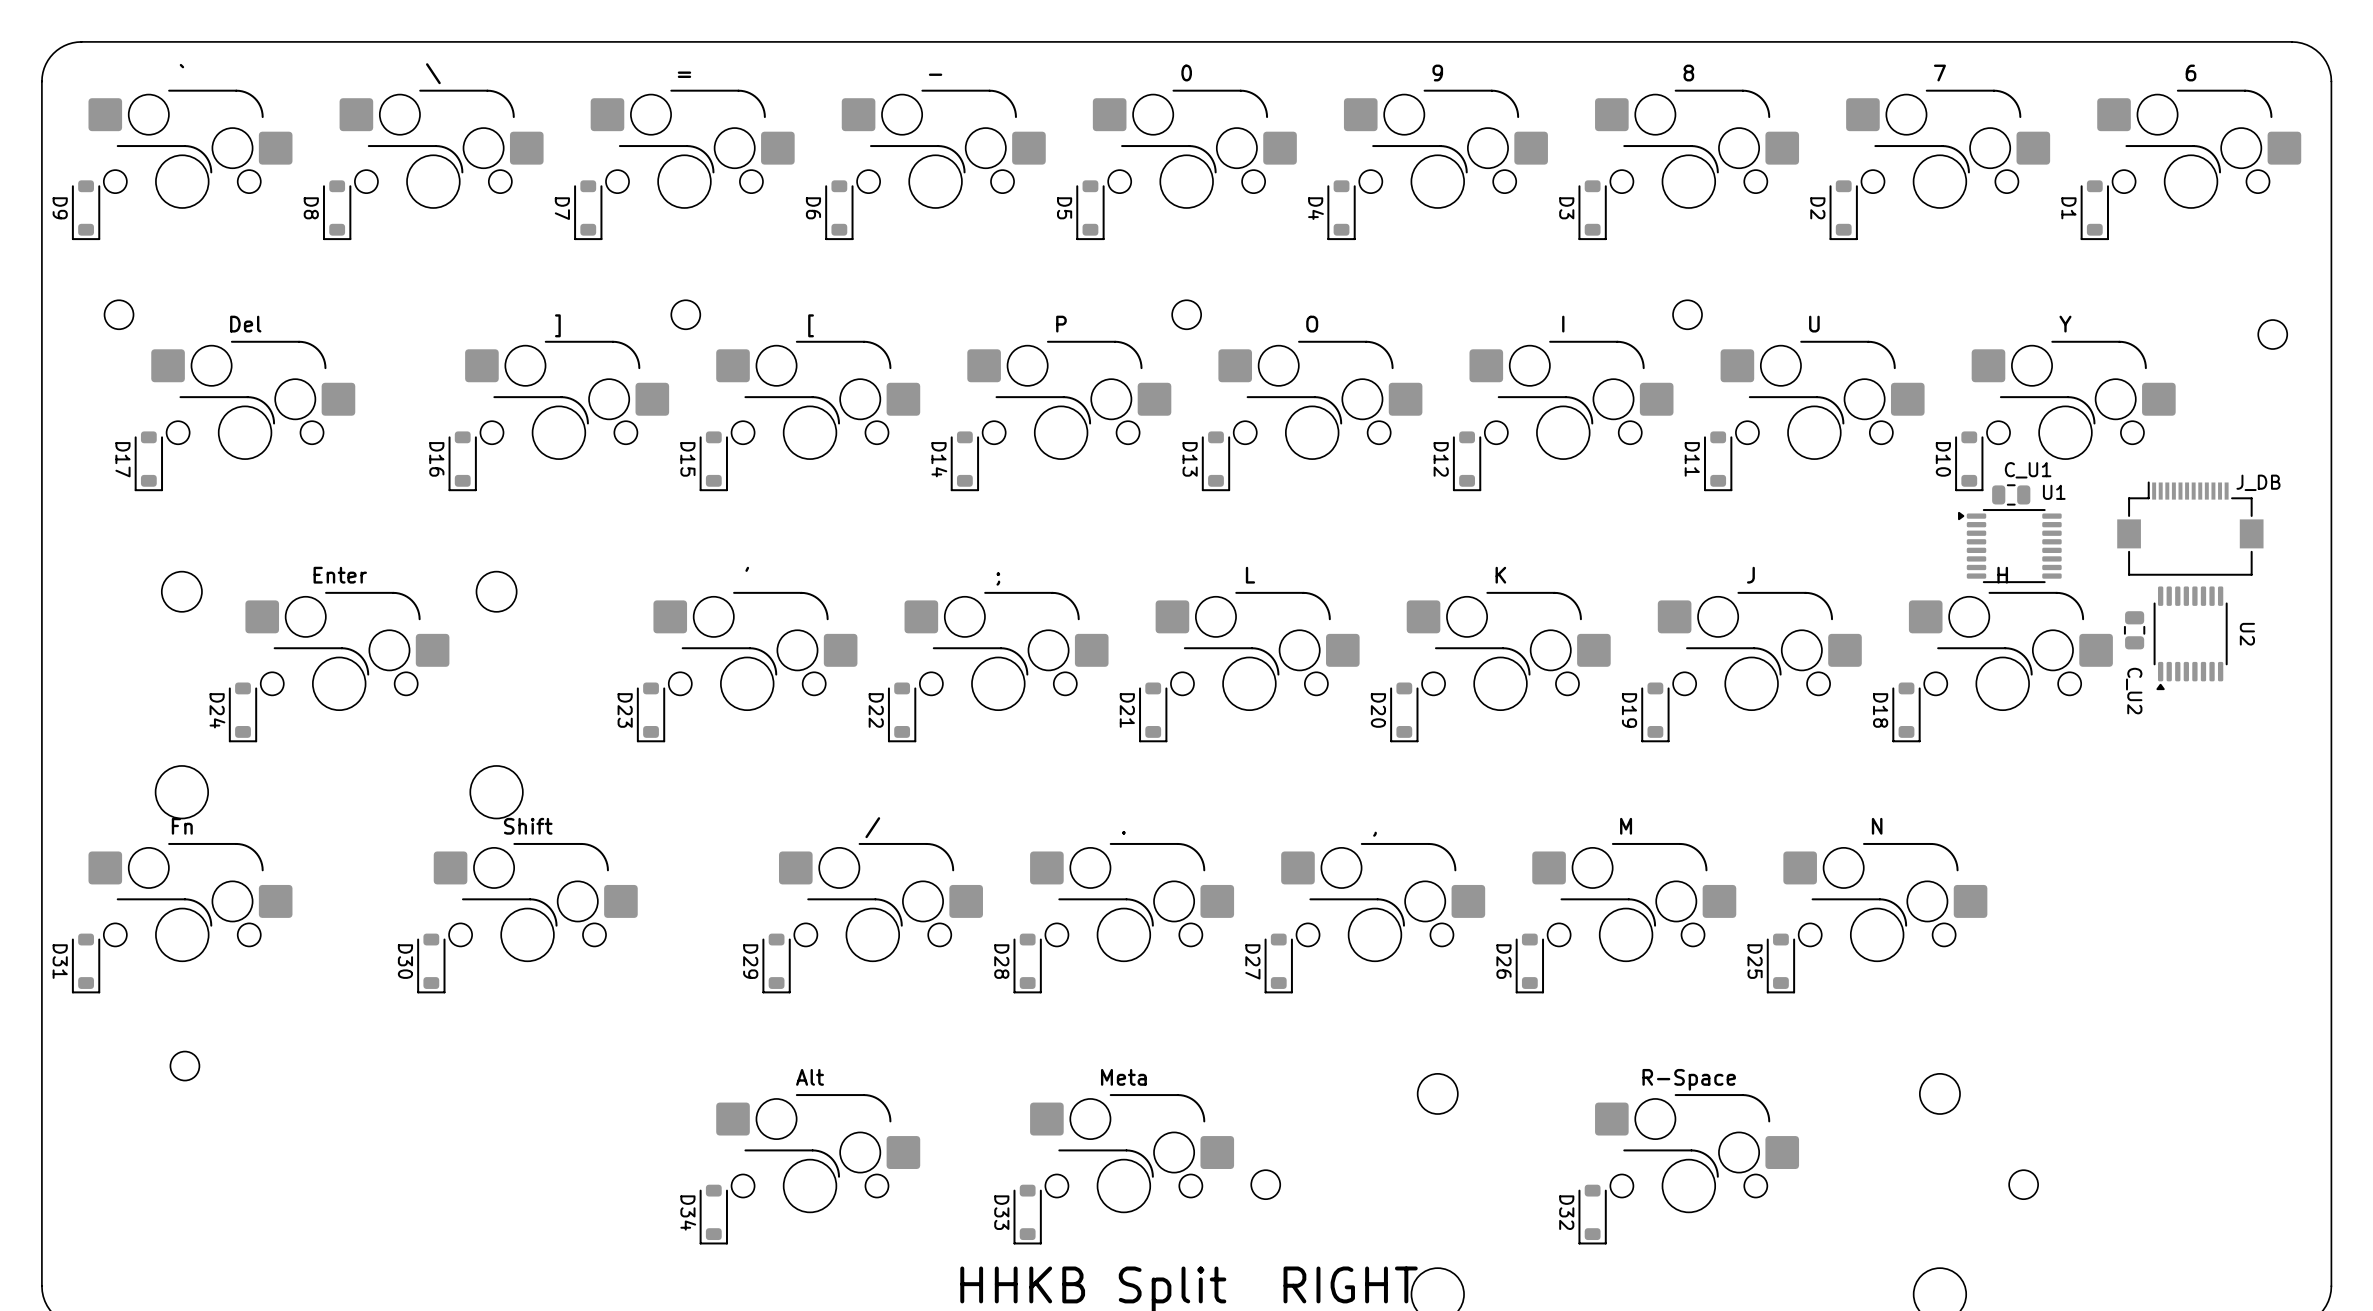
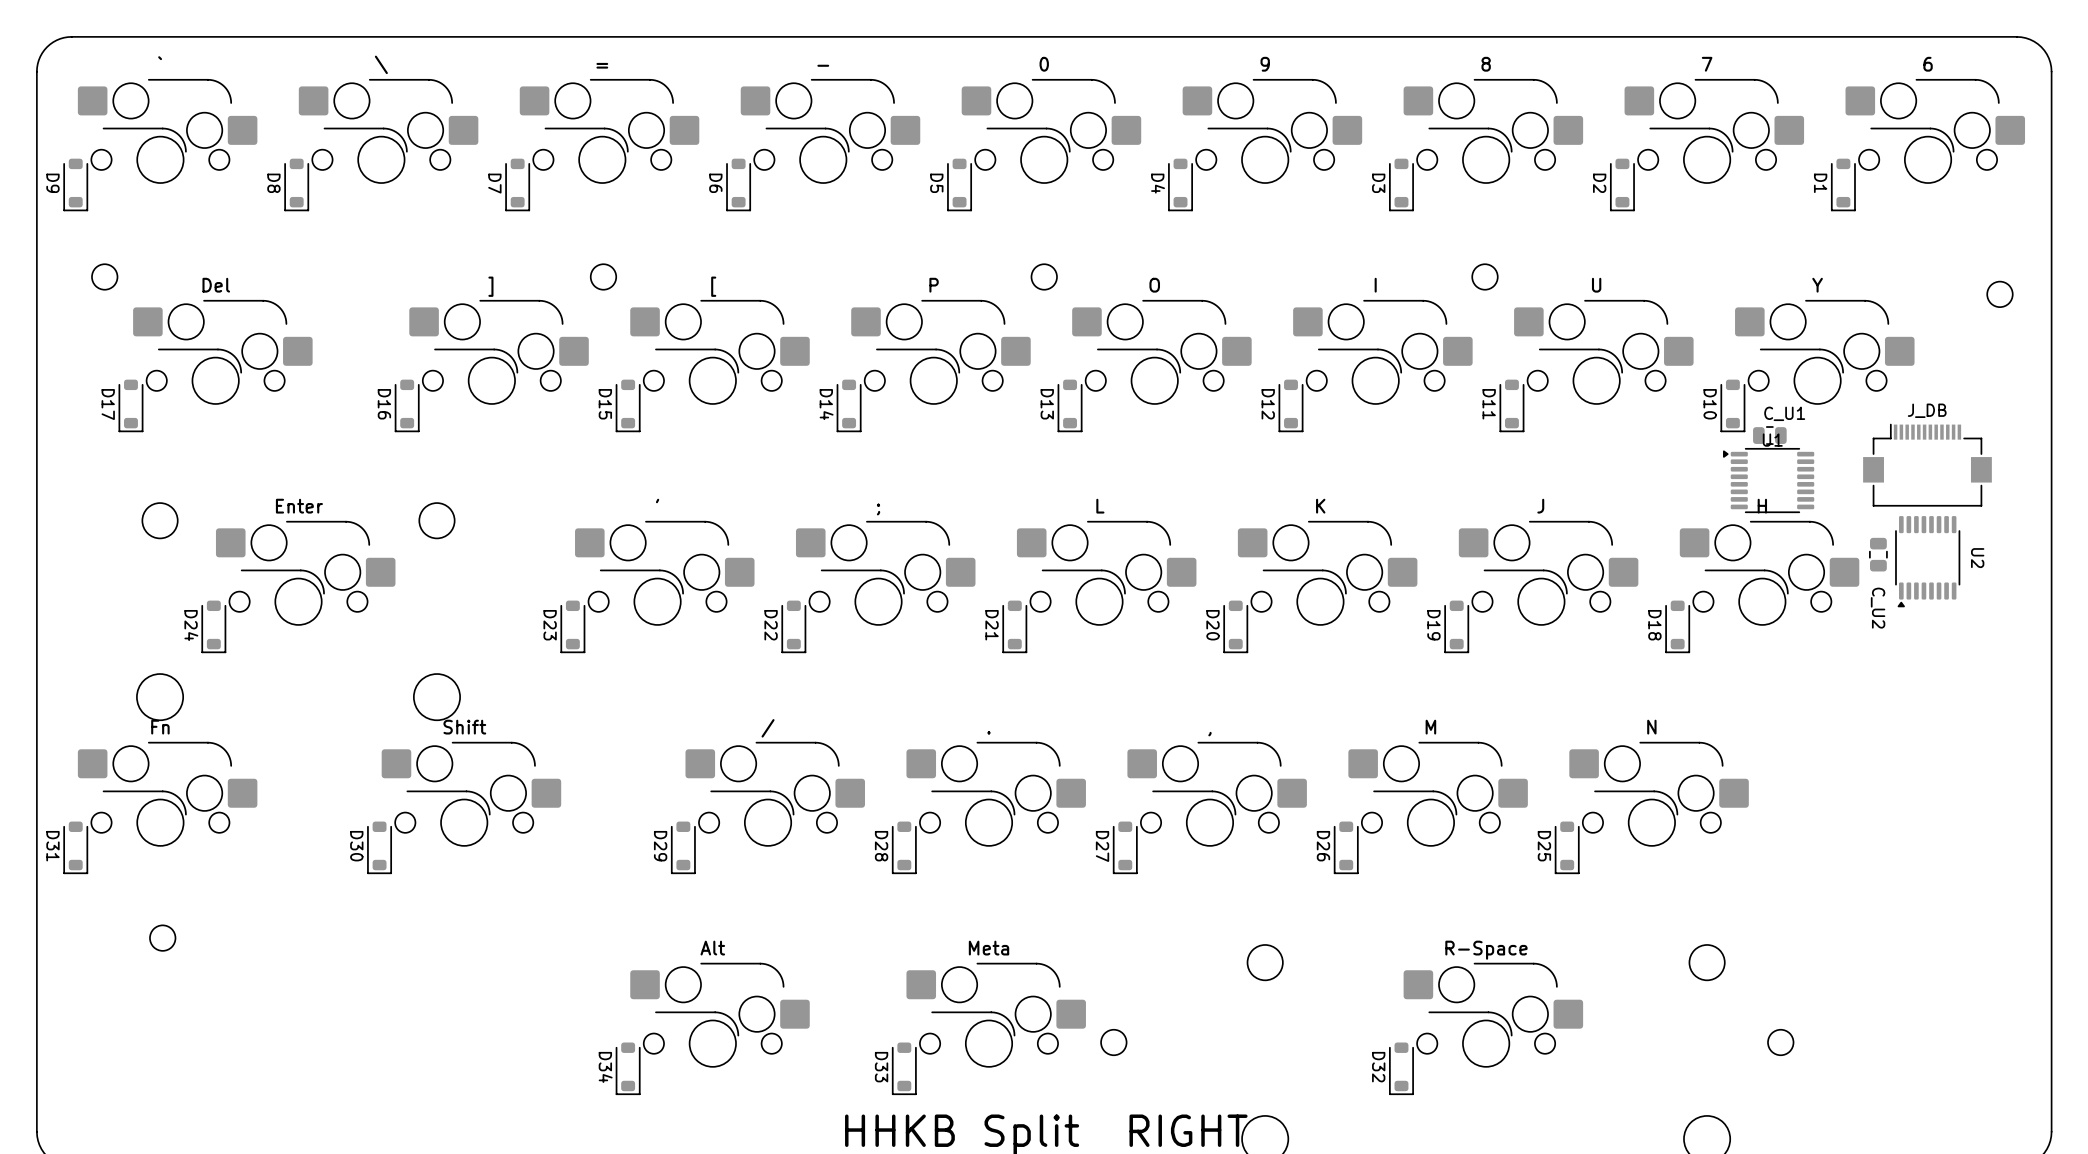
J_DB name position: J_DB (2258, 482) -> J_DB (1927, 410)
U1 name position: U1 (2054, 492) -> U1 (1772, 440)

